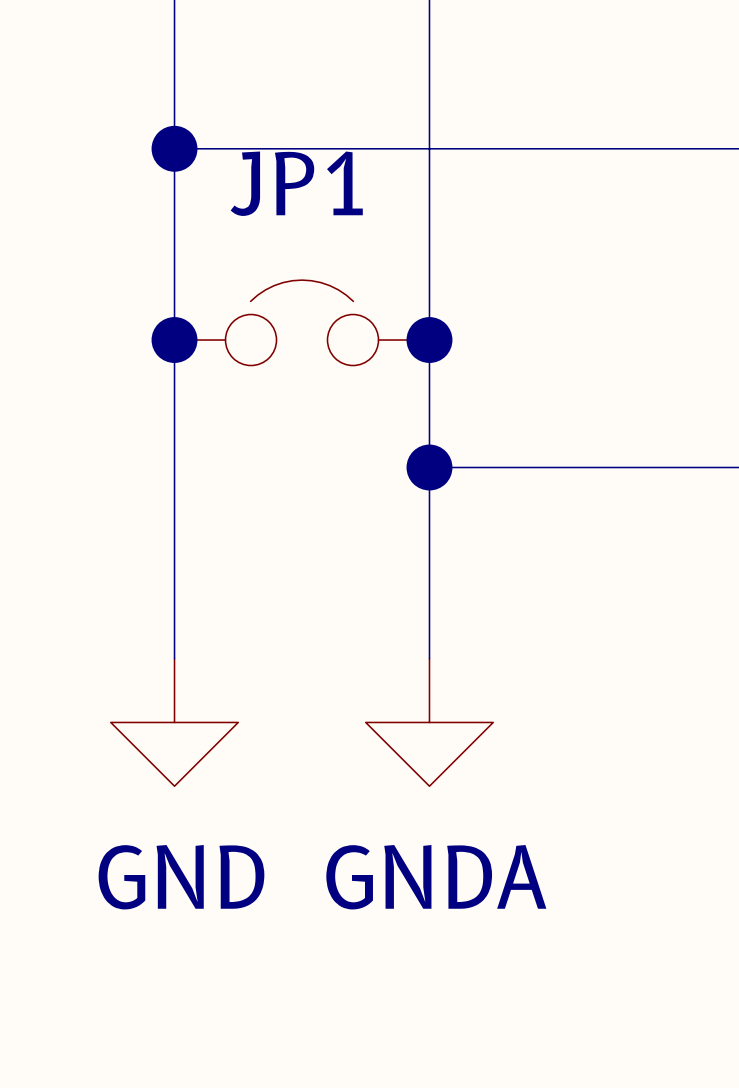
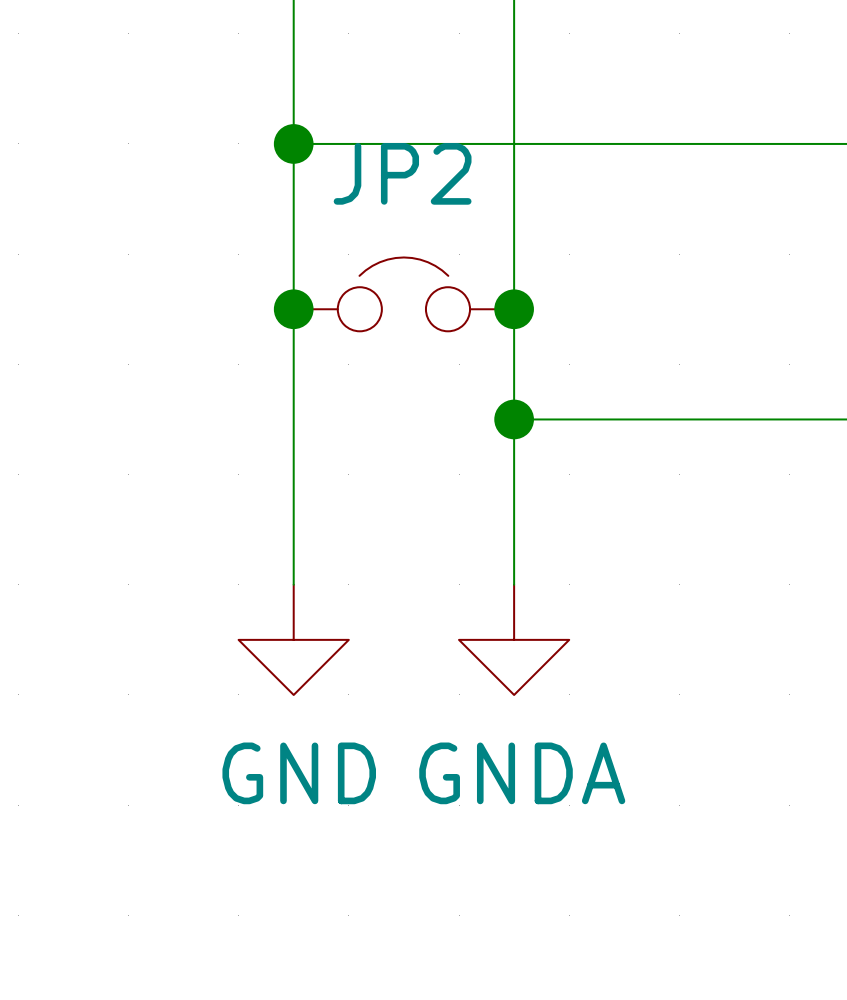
JP1 name: JP1 (296, 183) -> JP2 (402, 173)

